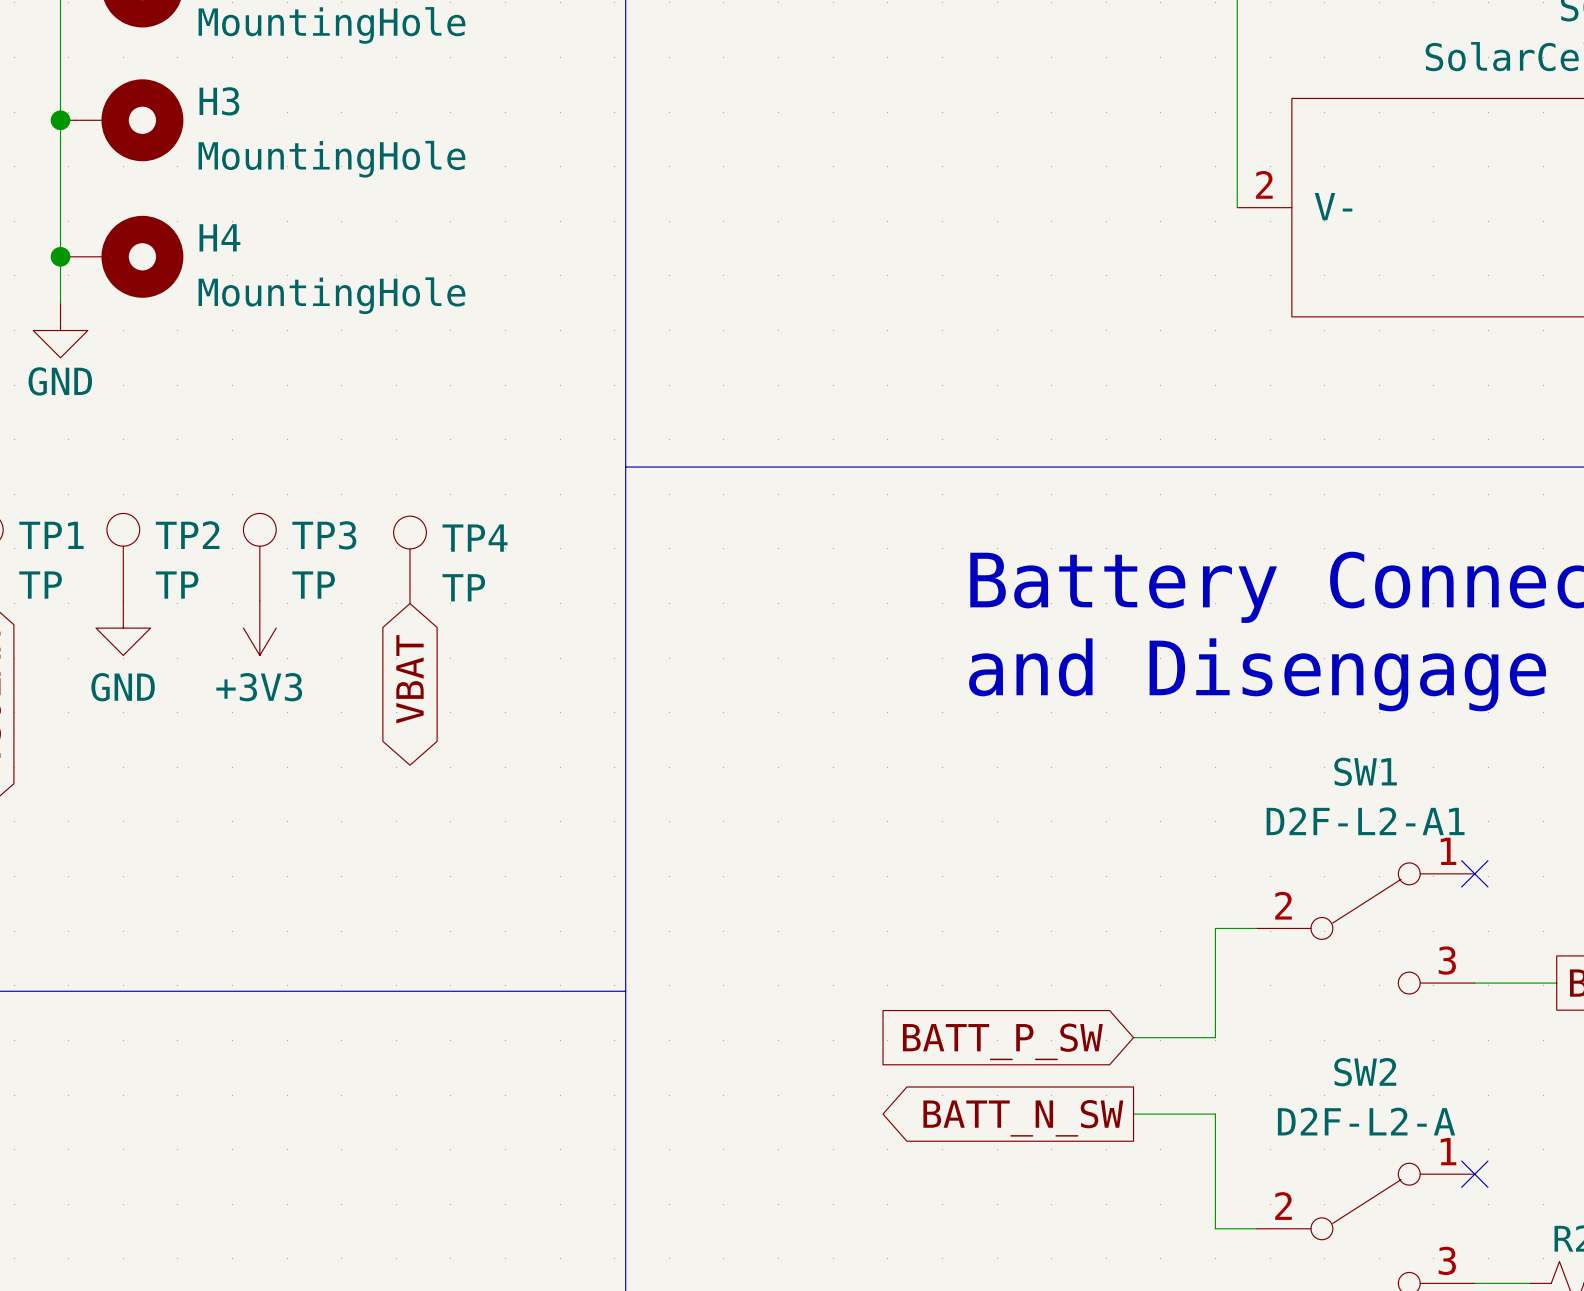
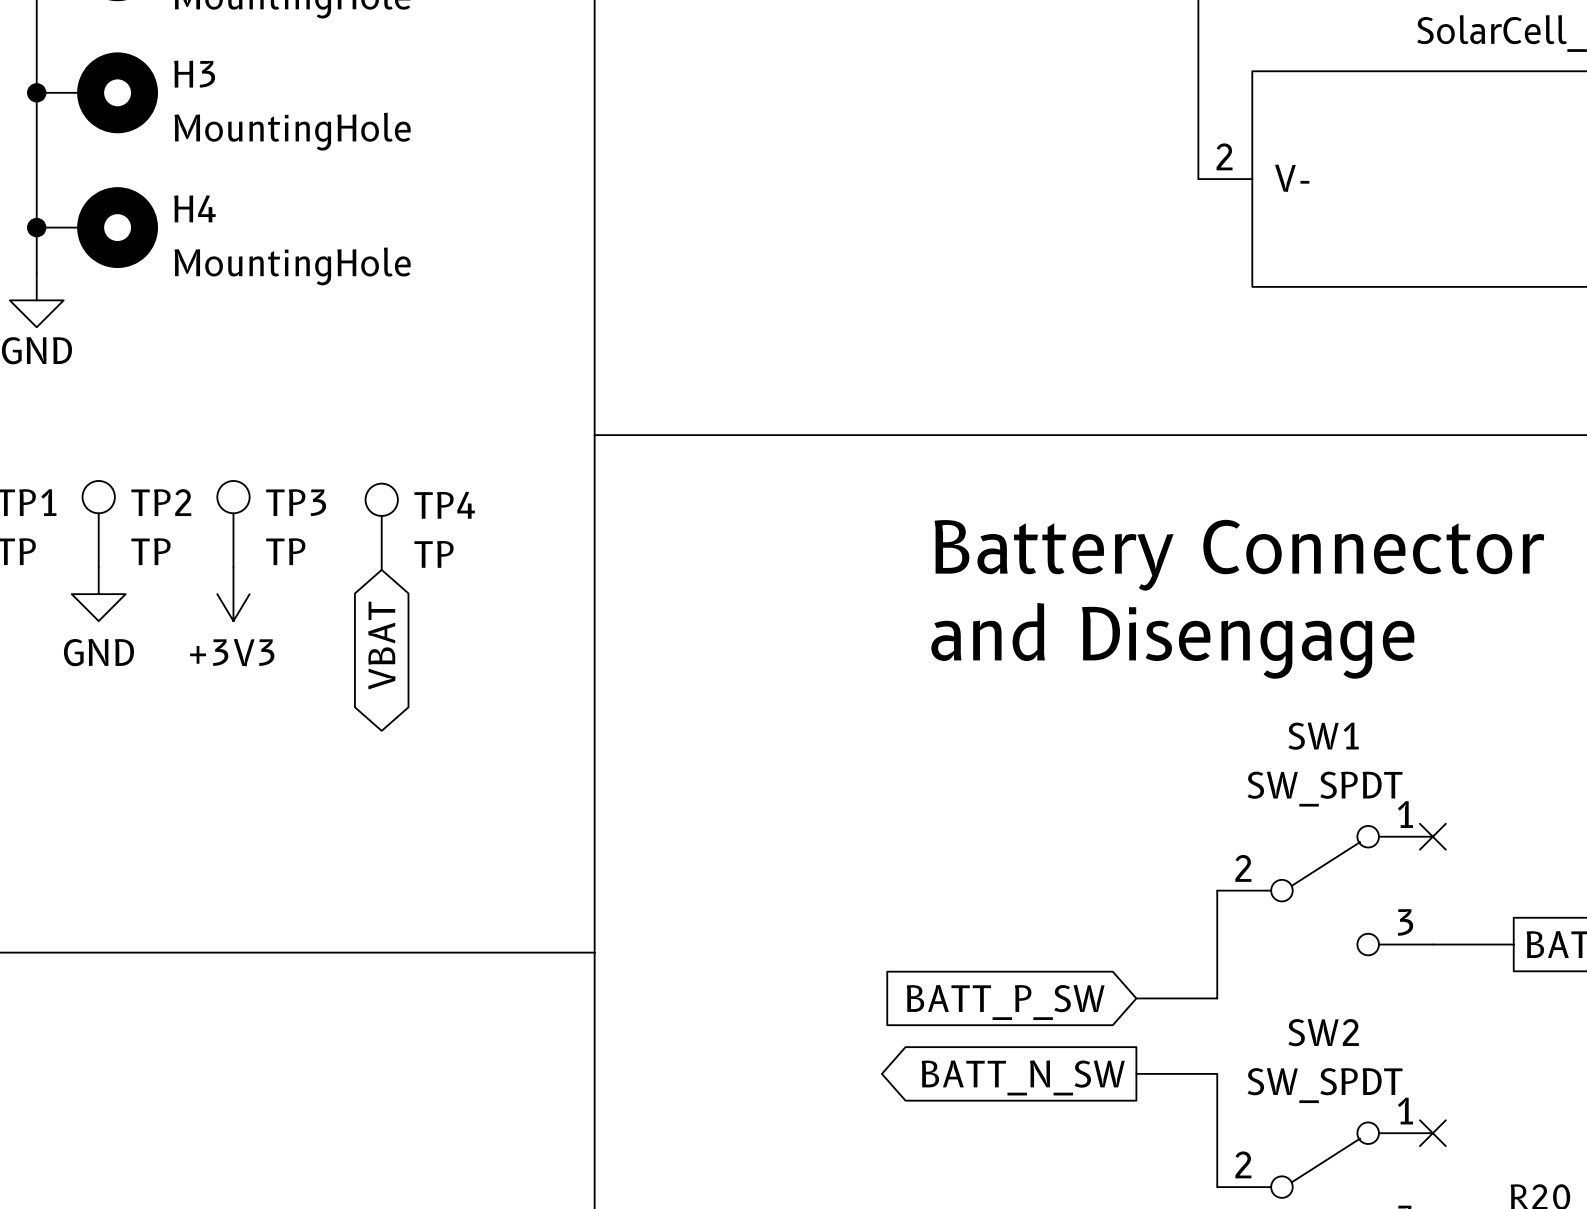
SW1 value: D2F-L2-A1 (1365, 821) -> SW_SPDT (1325, 789)
wire: (1256, 928) (1215, 928) (1215, 1037) -> (1217, 890) (1217, 998) (1176, 998)
wire: (1133, 1037) (1174, 1037) -> none
global label position: BATT_P_SW (1002, 1041) -> BATT_P_SW (1005, 1002)
wire: (1133, 1114) (1174, 1114) -> none
wire: (1215, 1114) (1215, 1228) (1256, 1228) -> (1176, 1073) (1217, 1073) (1217, 1187)
global label position: BATT_N_SW (1023, 1118) -> BATT_N_SW (1023, 1077)
SW2 value: D2F-L2-A (1366, 1121) -> SW_SPDT (1325, 1085)

